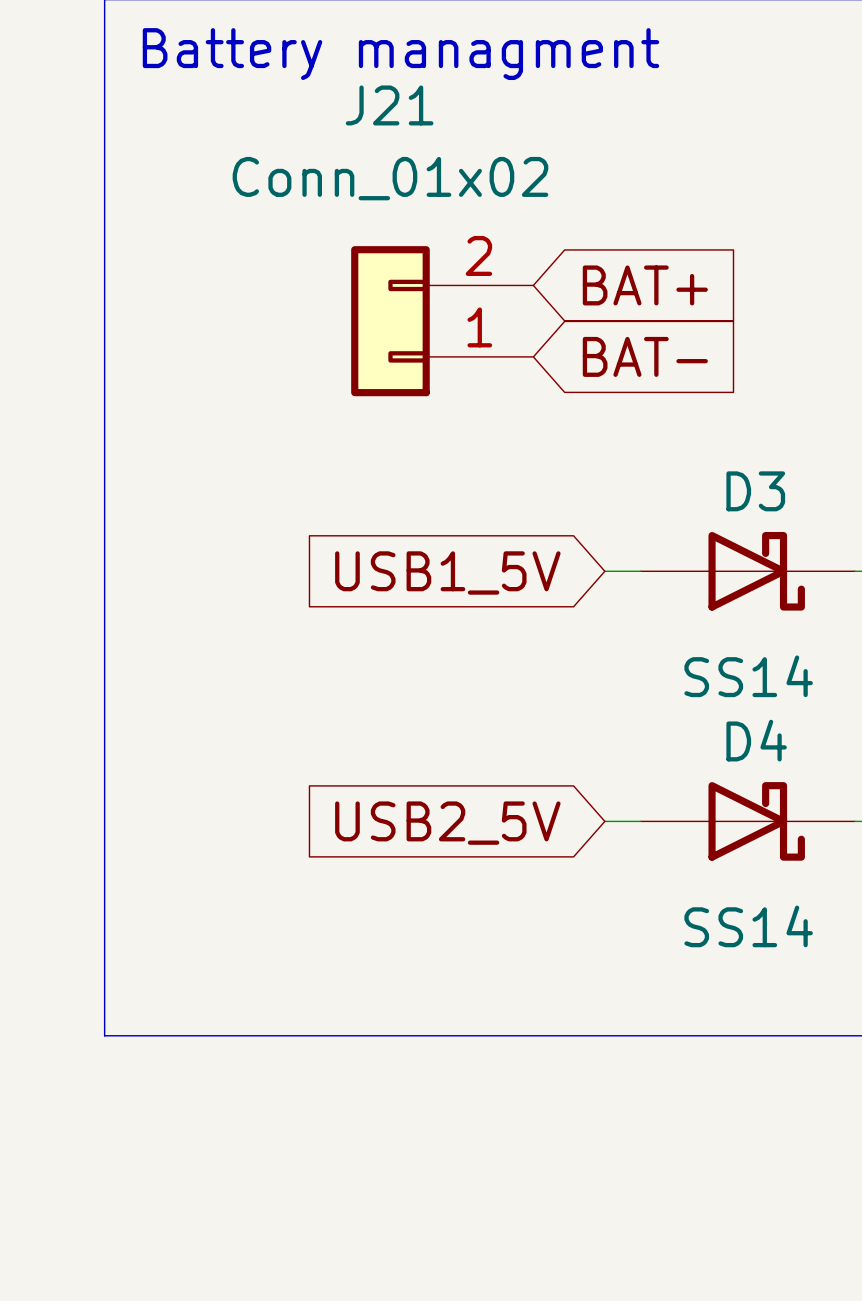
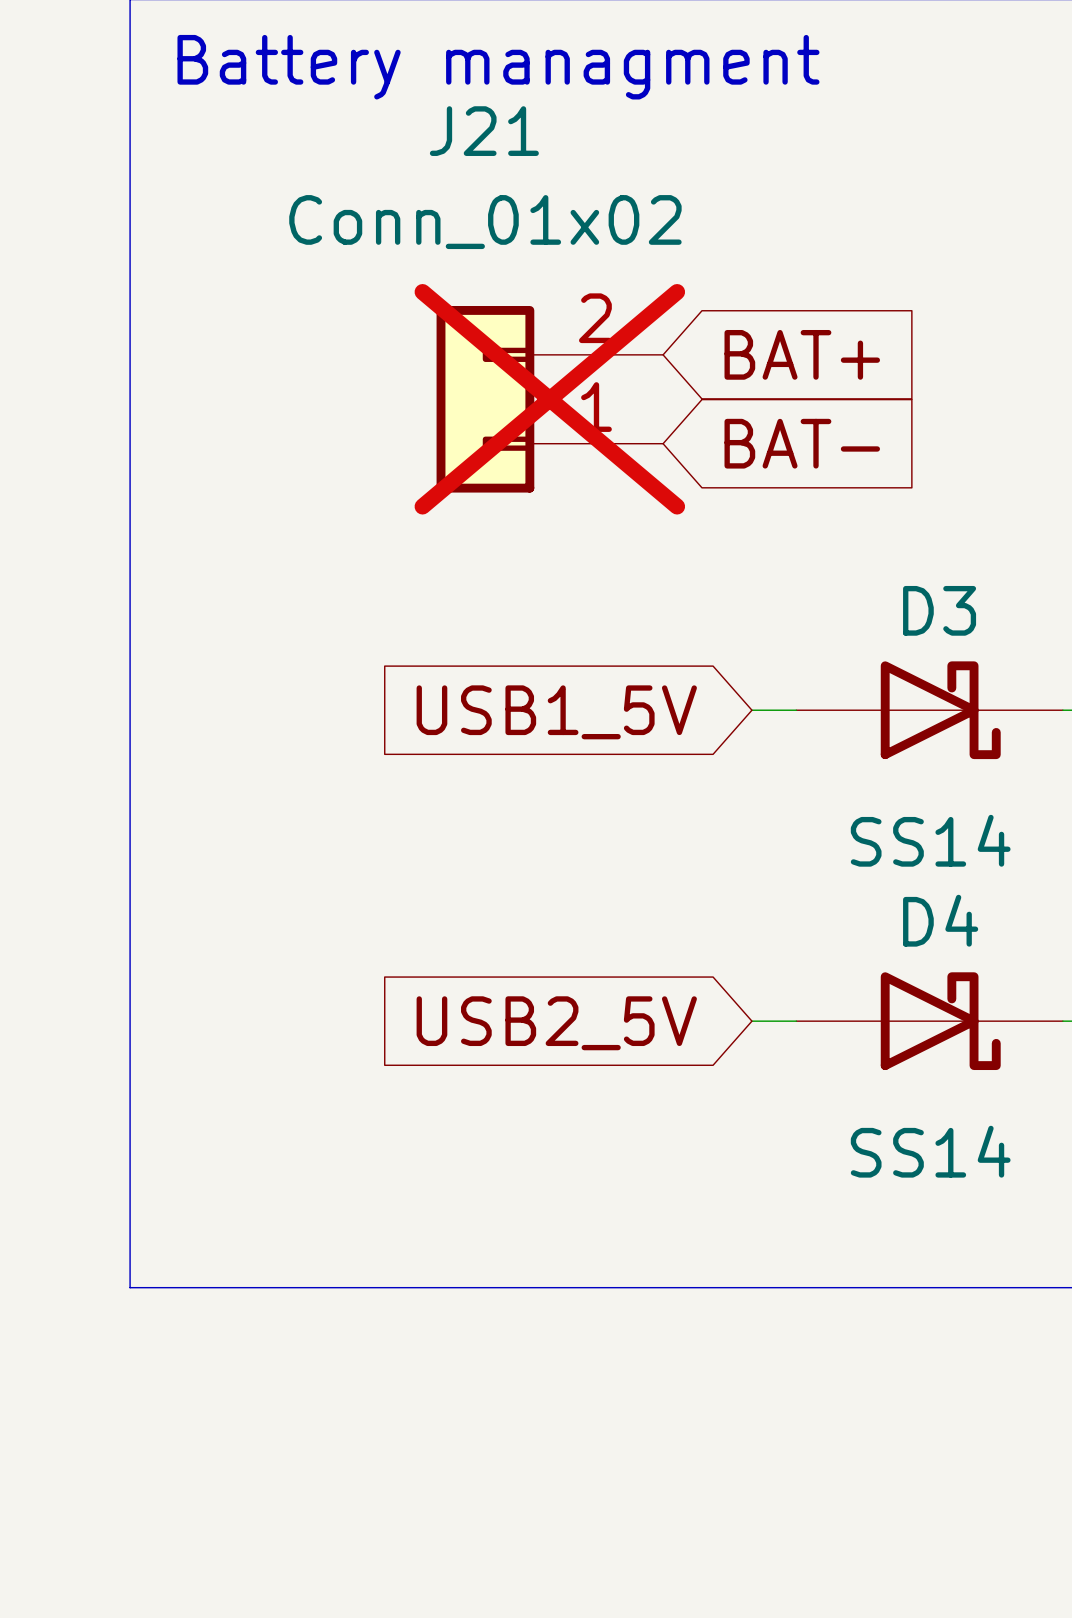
J21 do-not-place cross: none -> (549, 399)

